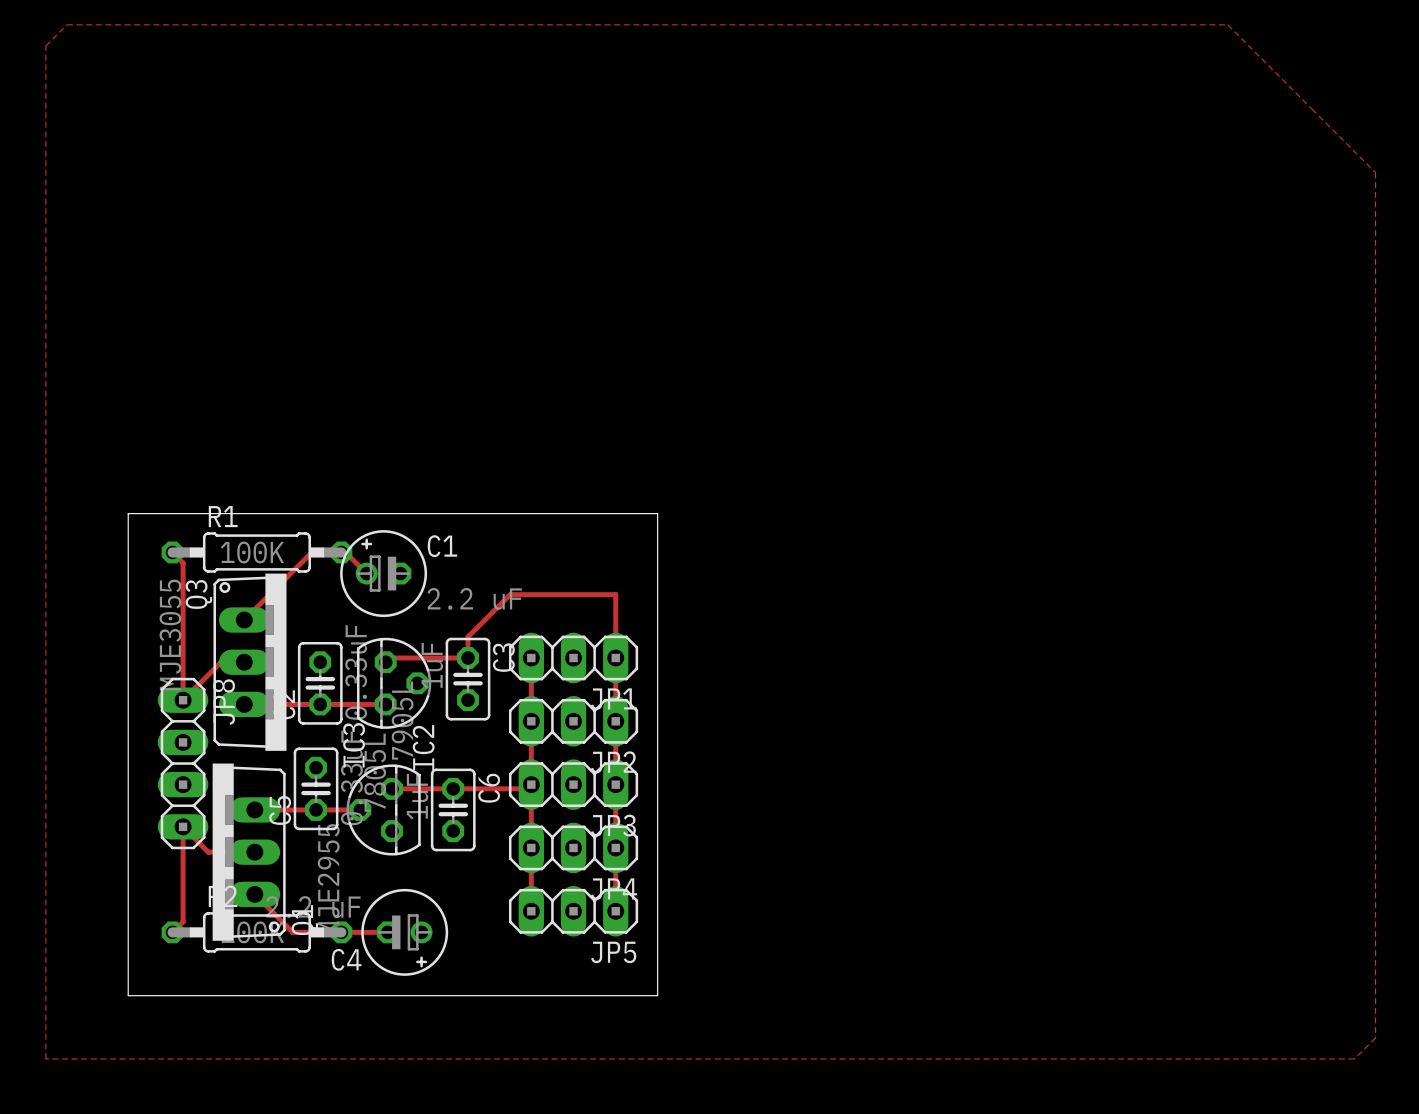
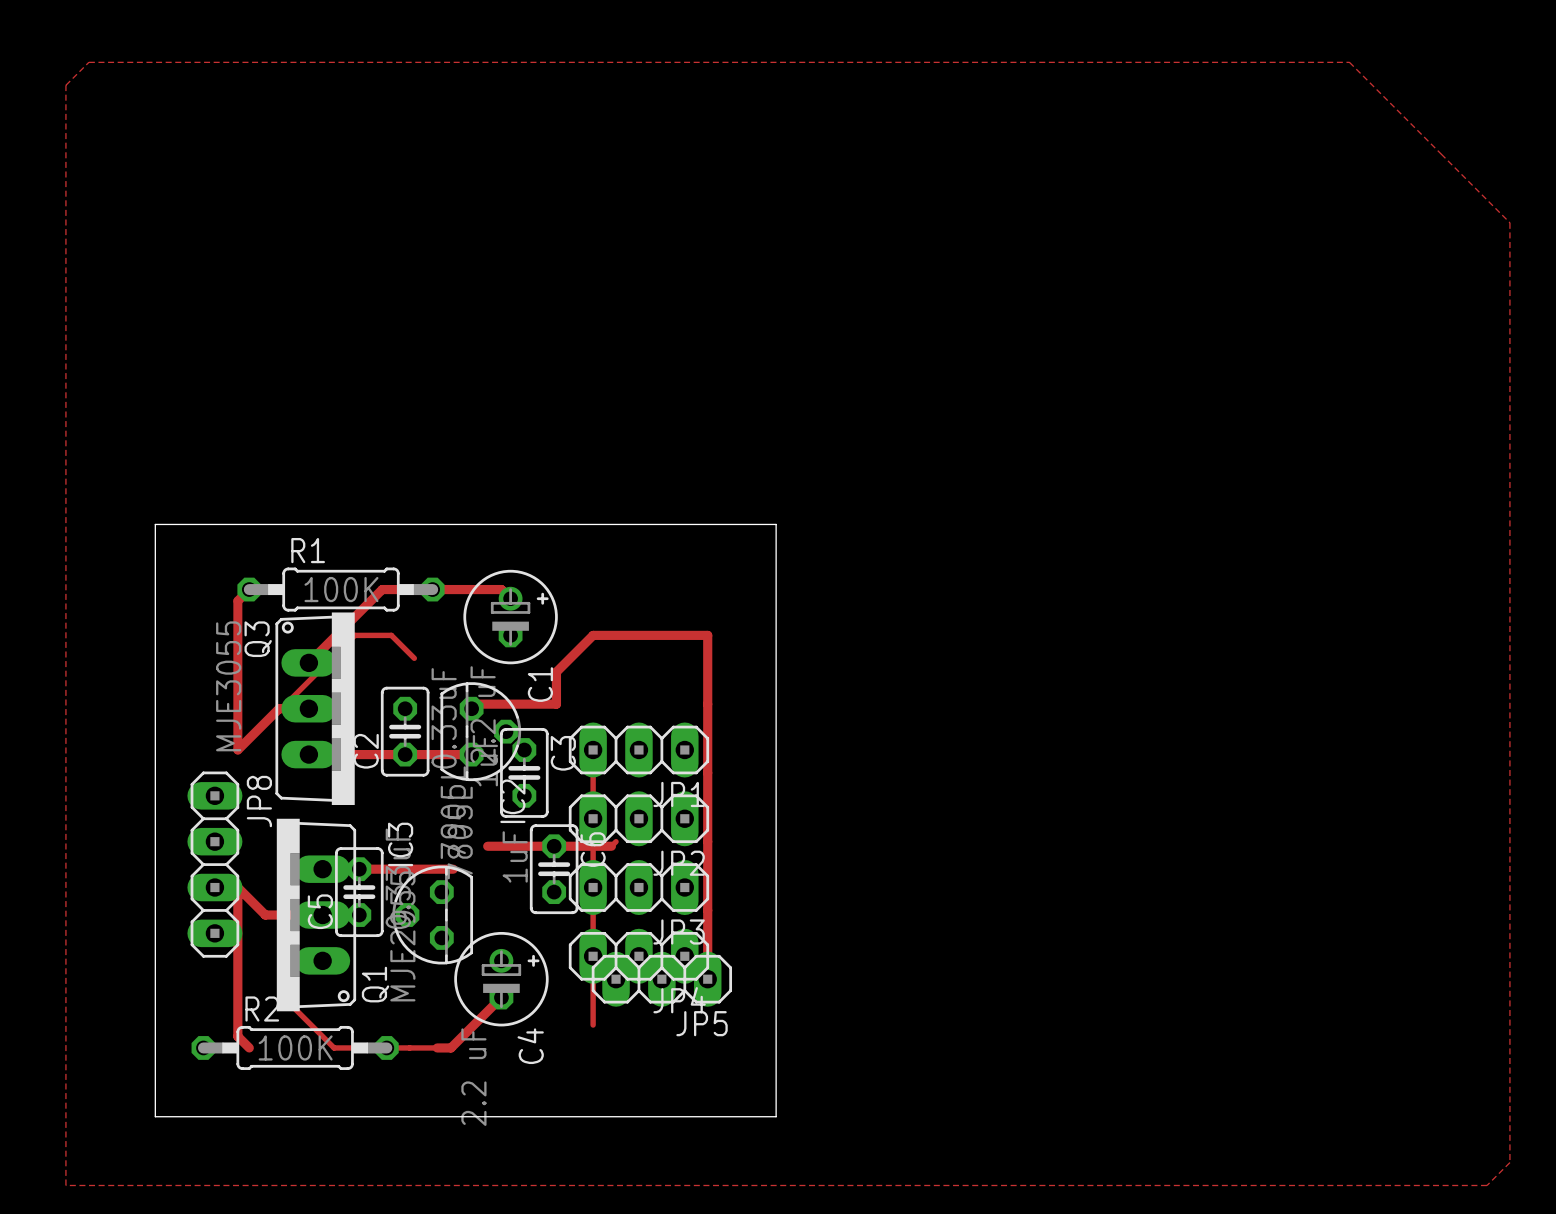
track: none -> (249, 589) (237, 601) (237, 749) (279, 708) (308, 708)
board edge: (128, 513) (657, 513) (657, 995) -> (155, 593) (155, 524) (776, 524) (776, 1116) (730, 1116)
track: none -> (510, 598) (501, 589) (382, 589) (308, 662)
track: (172, 552) (183, 563) (183, 700) (221, 662) (244, 662) -> none
R1 position: (256, 552) -> (340, 589)
C1 rotation: 0° (383, 573) -> 90° clockwise (510, 617)
C1 position: (383, 573) -> (510, 617)
track: none -> (471, 708) (476, 704) (556, 704) (556, 672) (593, 635) (707, 635) (707, 979)
Q3 position: (249, 662) -> (315, 708)
track: none -> (308, 754) (471, 754)
track: (385, 662) (389, 658) (468, 658) (468, 636) (510, 594) (615, 594) (615, 911) -> none
C2 position: (320, 683) -> (405, 731)
IC2 position: (394, 683) -> (480, 731)
track: (244, 704) (385, 704) -> none
track: none -> (616, 841) (611, 846) (487, 846)
track: none -> (322, 869) (453, 869)
track: (531, 784) (527, 788) (392, 788) -> none
track: none -> (292, 915) (265, 915) (237, 887) (237, 1036) (249, 1047)
track: (282, 809) (360, 809) -> none
C6 position: (453, 809) -> (554, 869)
Q1 position: (249, 852) -> (316, 915)
track: (254, 852) (208, 852) (183, 826) (183, 921) (172, 932) -> none
track: none -> (501, 997) (451, 1047) (437, 1047)
JP5 position: (573, 911) -> (661, 979)
C4 rotation: 0° (404, 932) -> 90° counterclockwise (501, 979)
C4 position: (404, 932) -> (501, 979)

